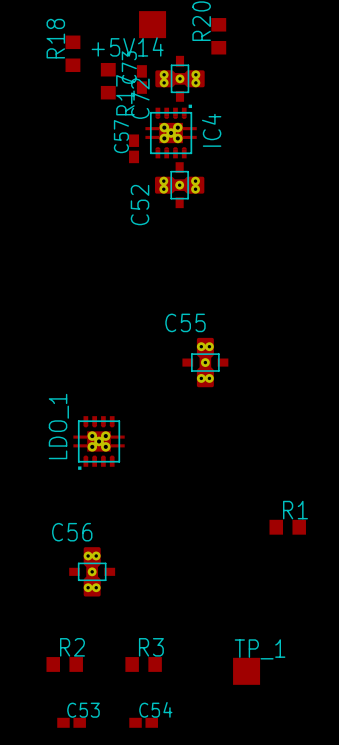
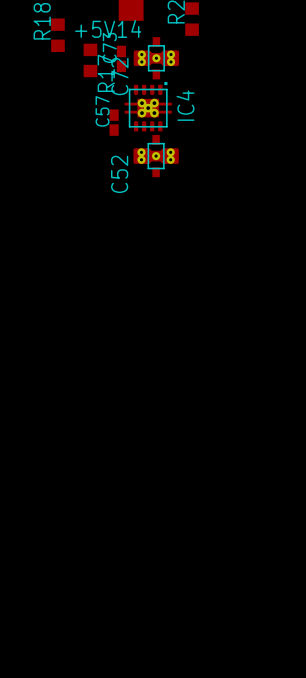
C55: (205, 362) -> none
LDO_1: (99, 442) -> none
R1: (287, 527) -> none
C56: (92, 571) -> none
R2: (64, 664) -> none
R3: (143, 664) -> none
TP_1: (246, 671) -> none
C53: (71, 722) -> none
C54: (143, 722) -> none

